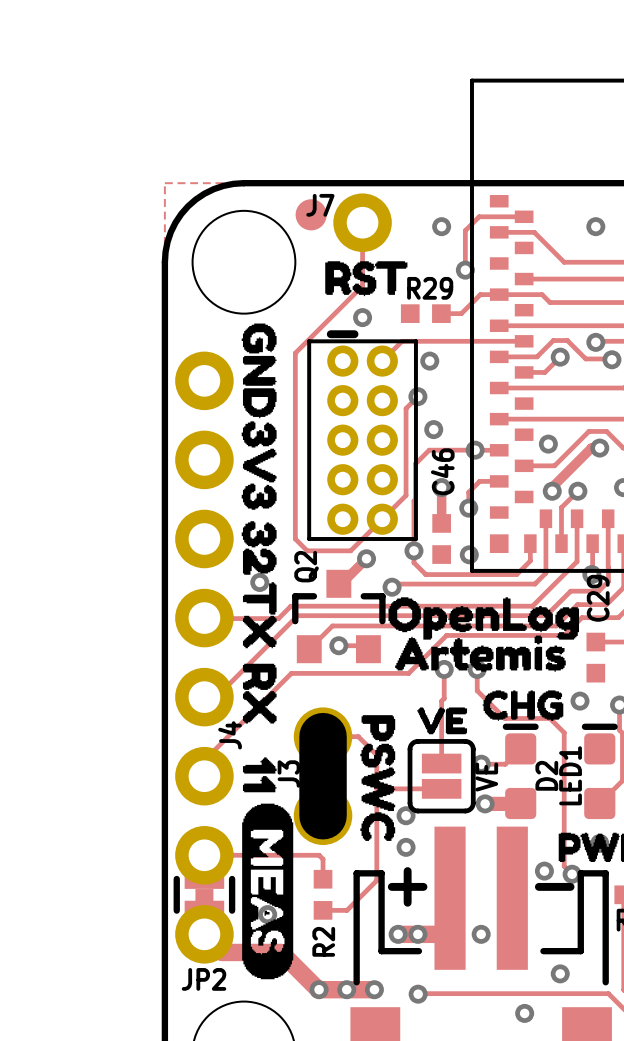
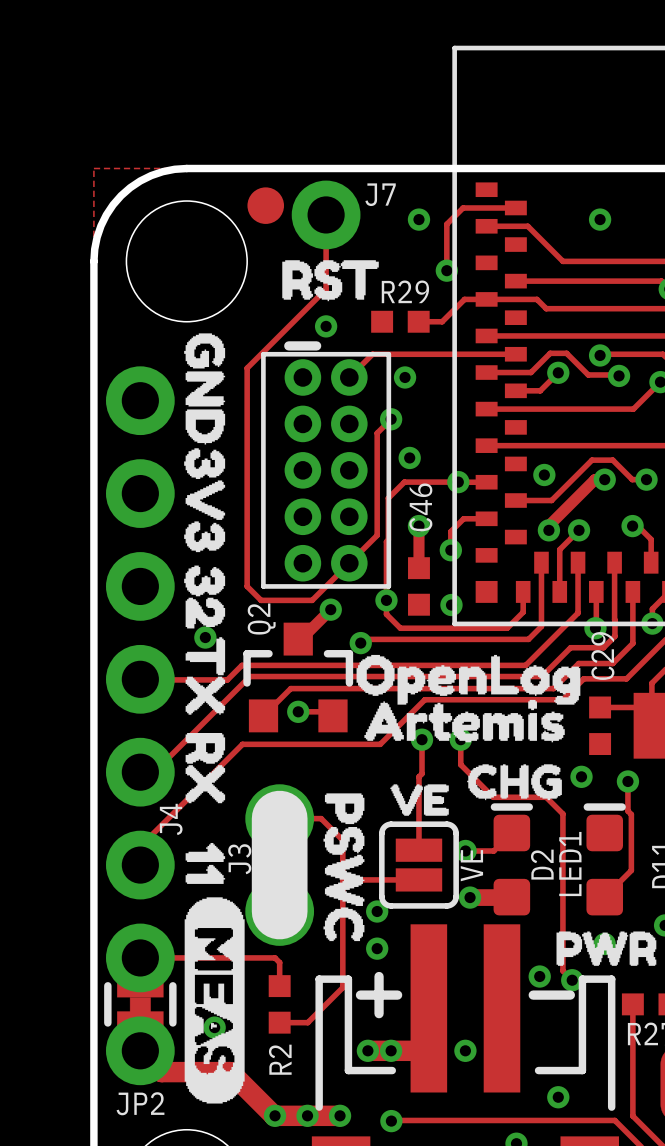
J7 name position: J7 (320, 205) -> J7 (380, 194)

